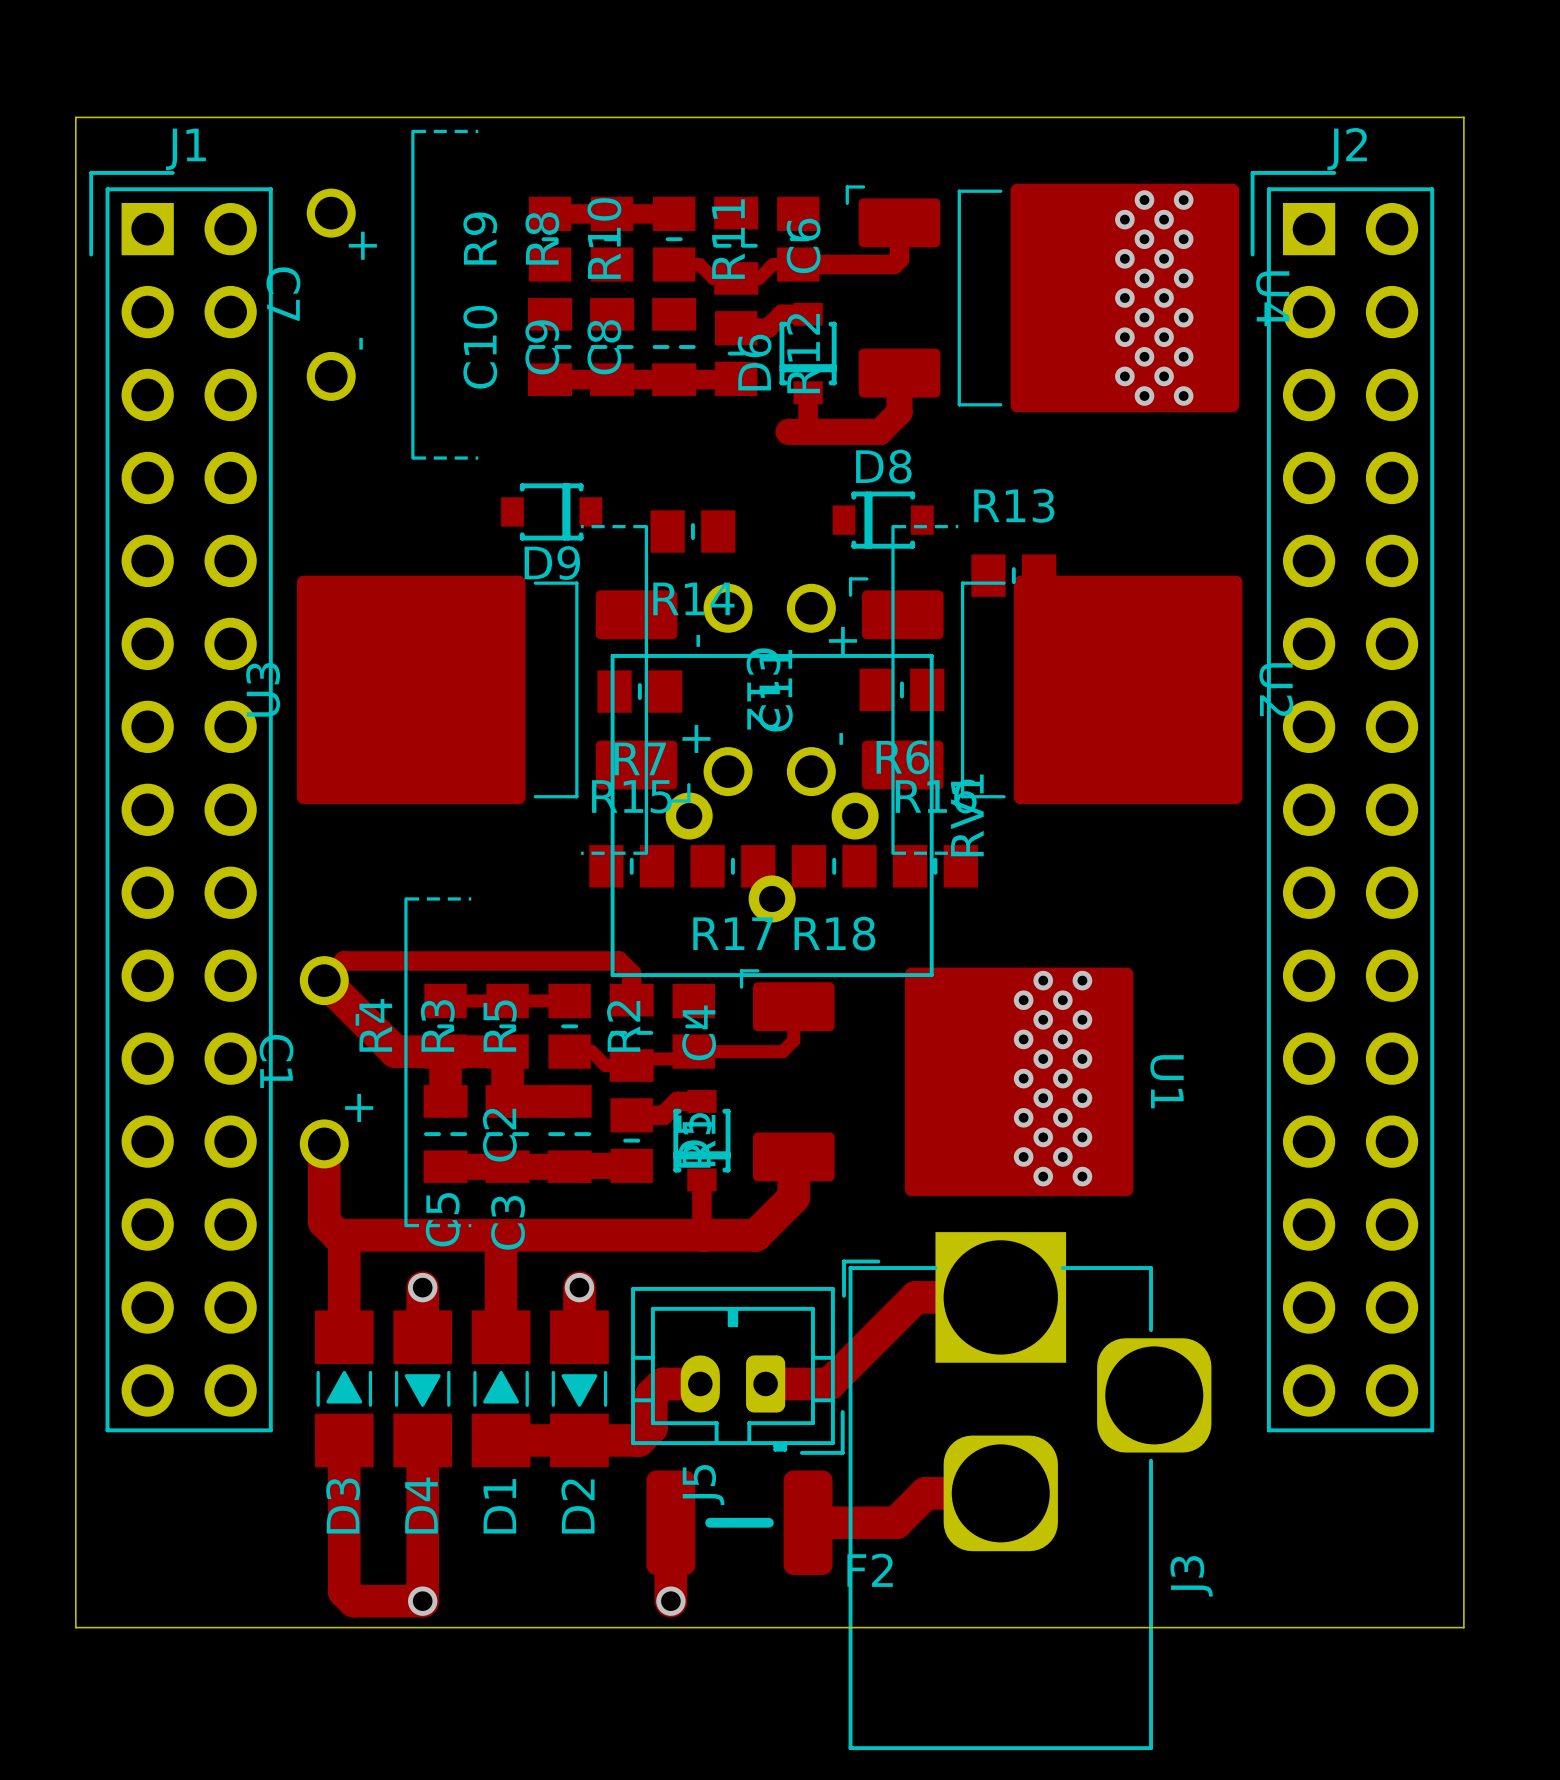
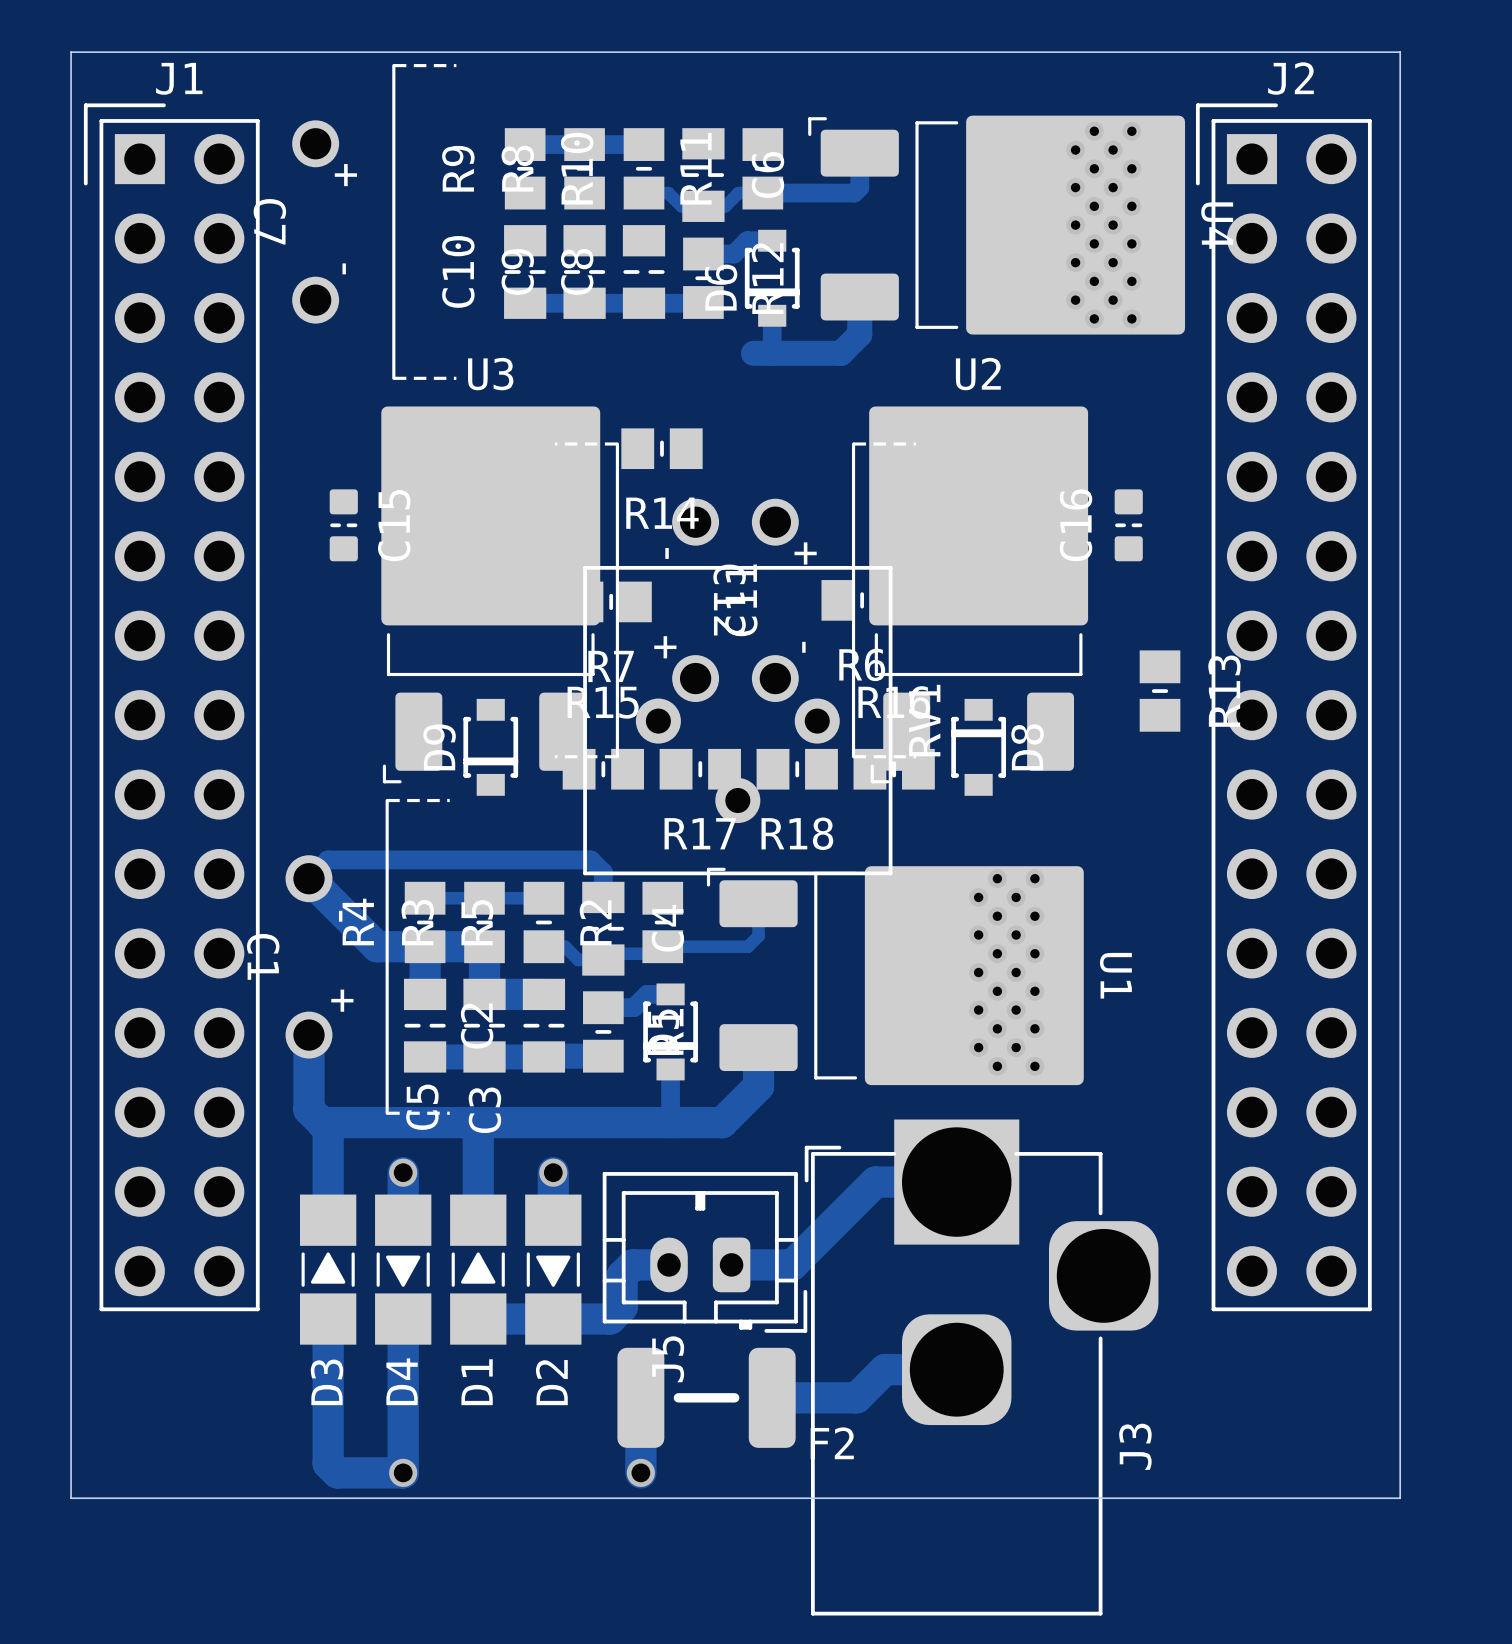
D9 rotation: 0° (551, 511) -> 90° clockwise (490, 747)
D9 position: (551, 511) -> (490, 747)
D8 rotation: 0° (883, 520) -> 90° clockwise (978, 747)
D8 position: (883, 520) -> (978, 747)
R13 rotation: 0° (1013, 575) -> 90° clockwise (1160, 691)
R13 position: (1013, 575) -> (1160, 691)
part: none -> (343, 525)
part: none -> (1128, 525)
U3 rotation: 0° (493, 689) -> 90° clockwise (490, 594)
U2 rotation: 0° (1045, 689) -> 90° counterclockwise (978, 594)
U1 footprint: [739, 967, 1134, 1197] -> [706, 866, 1084, 1086]

